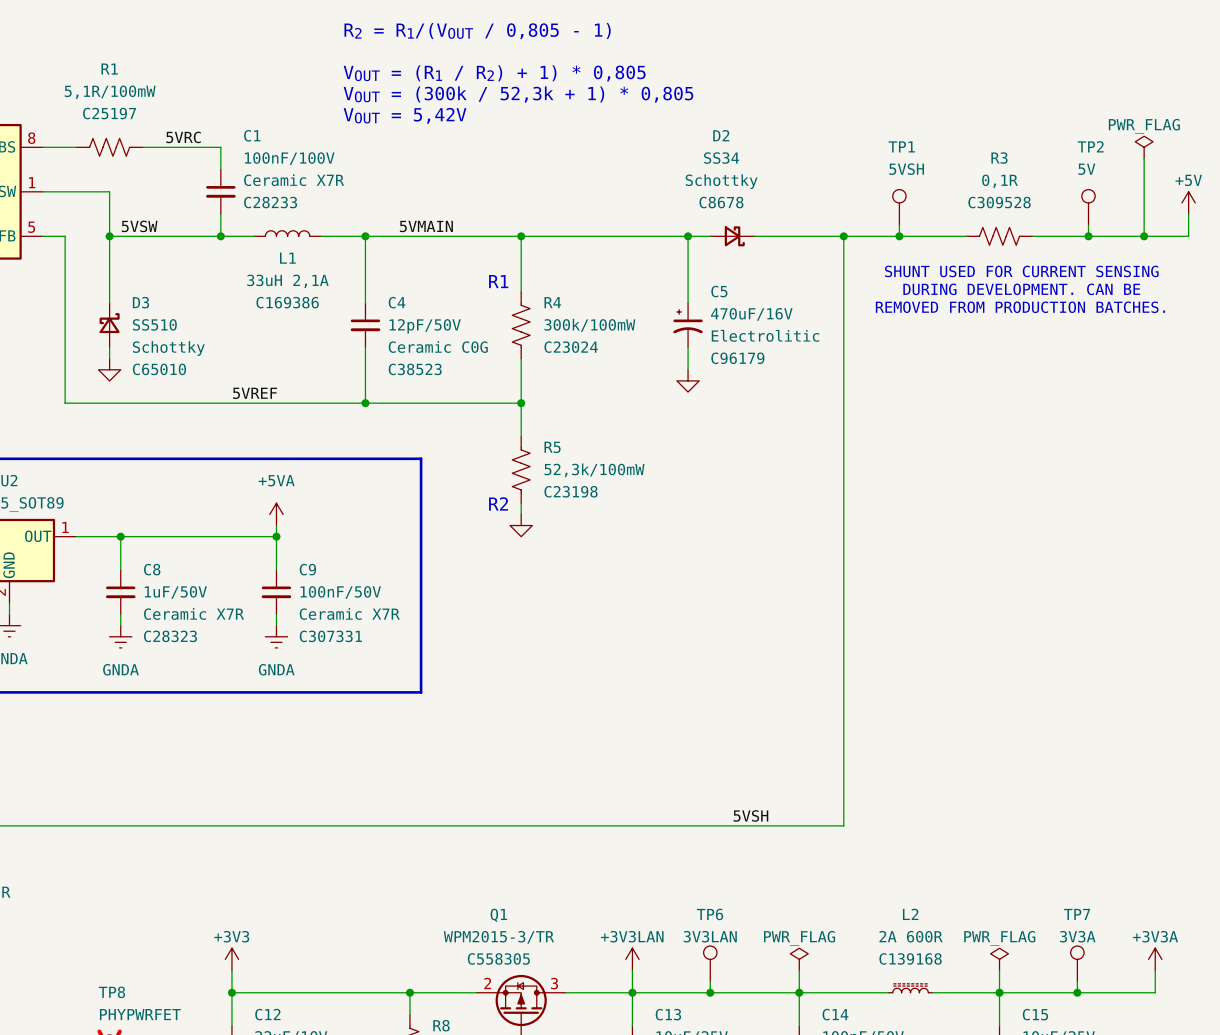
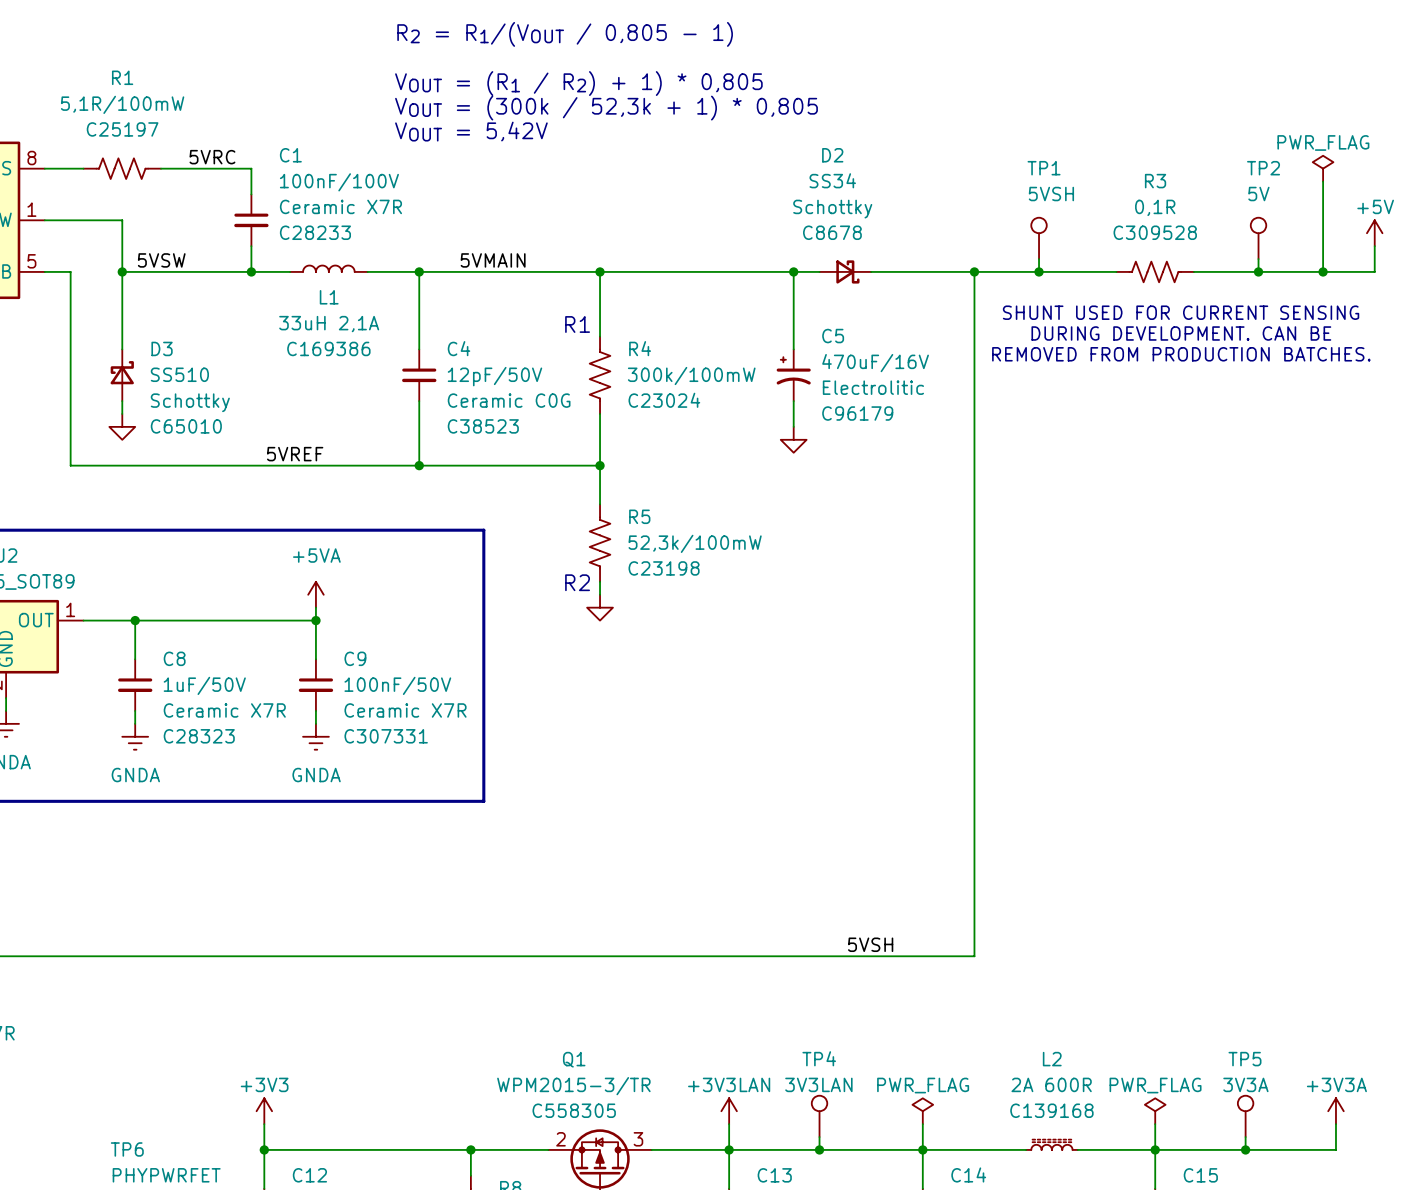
TP6 name: TP6 (709, 914) -> TP4 (819, 1058)
TP7 name: TP7 (1076, 914) -> TP5 (1244, 1059)
TP8 name: TP8 (111, 992) -> TP6 (127, 1149)

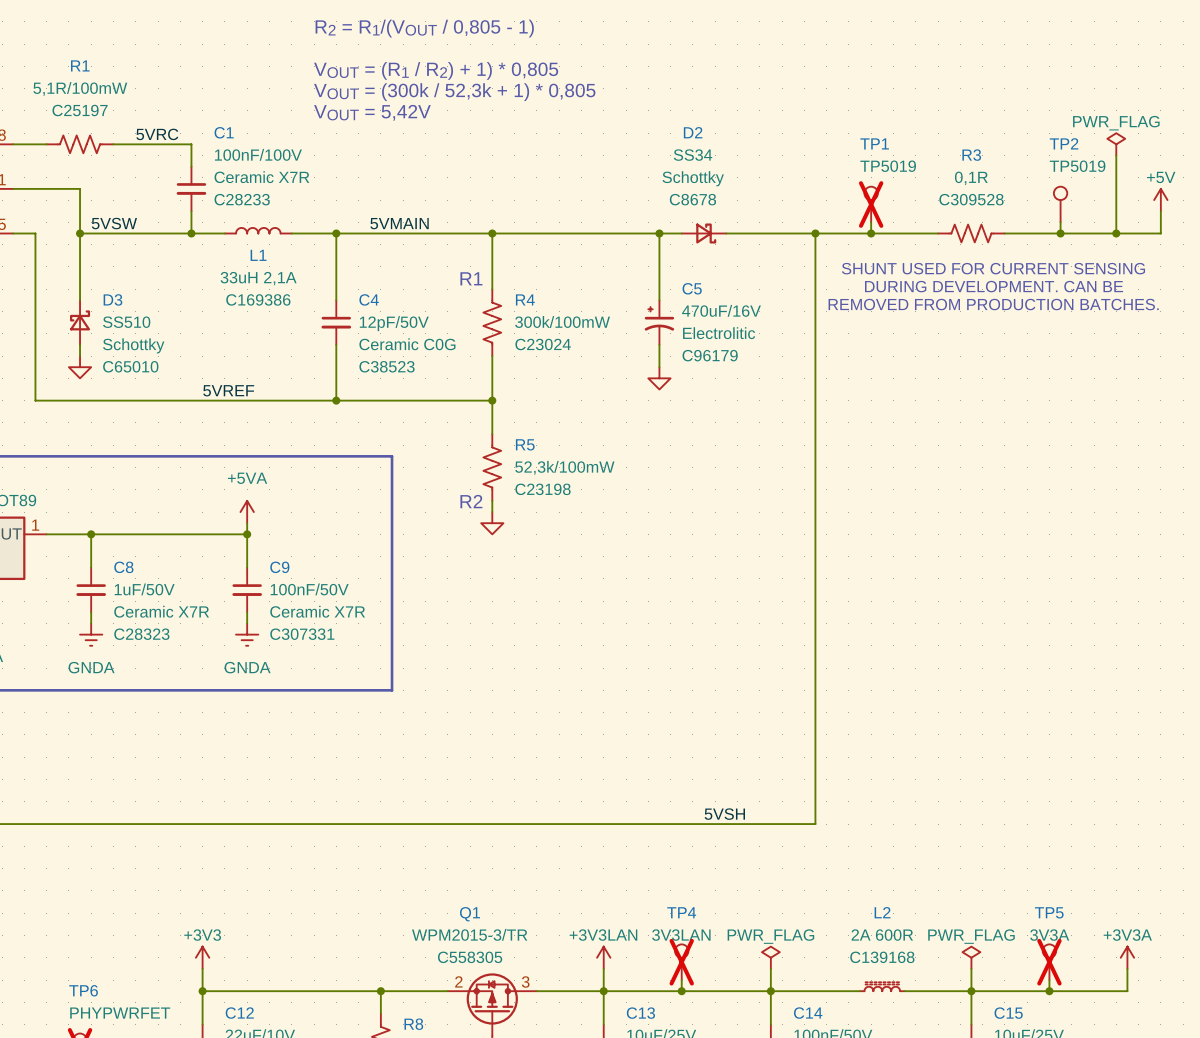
TP1 value: 5VSH (1051, 194) -> TP5019 (888, 166)
TP2 value: 5V (1258, 194) -> TP5019 (1077, 166)
TP1 do-not-place cross: none -> (871, 204)
TP4 do-not-place cross: none -> (681, 962)
TP5 do-not-place cross: none -> (1049, 962)

